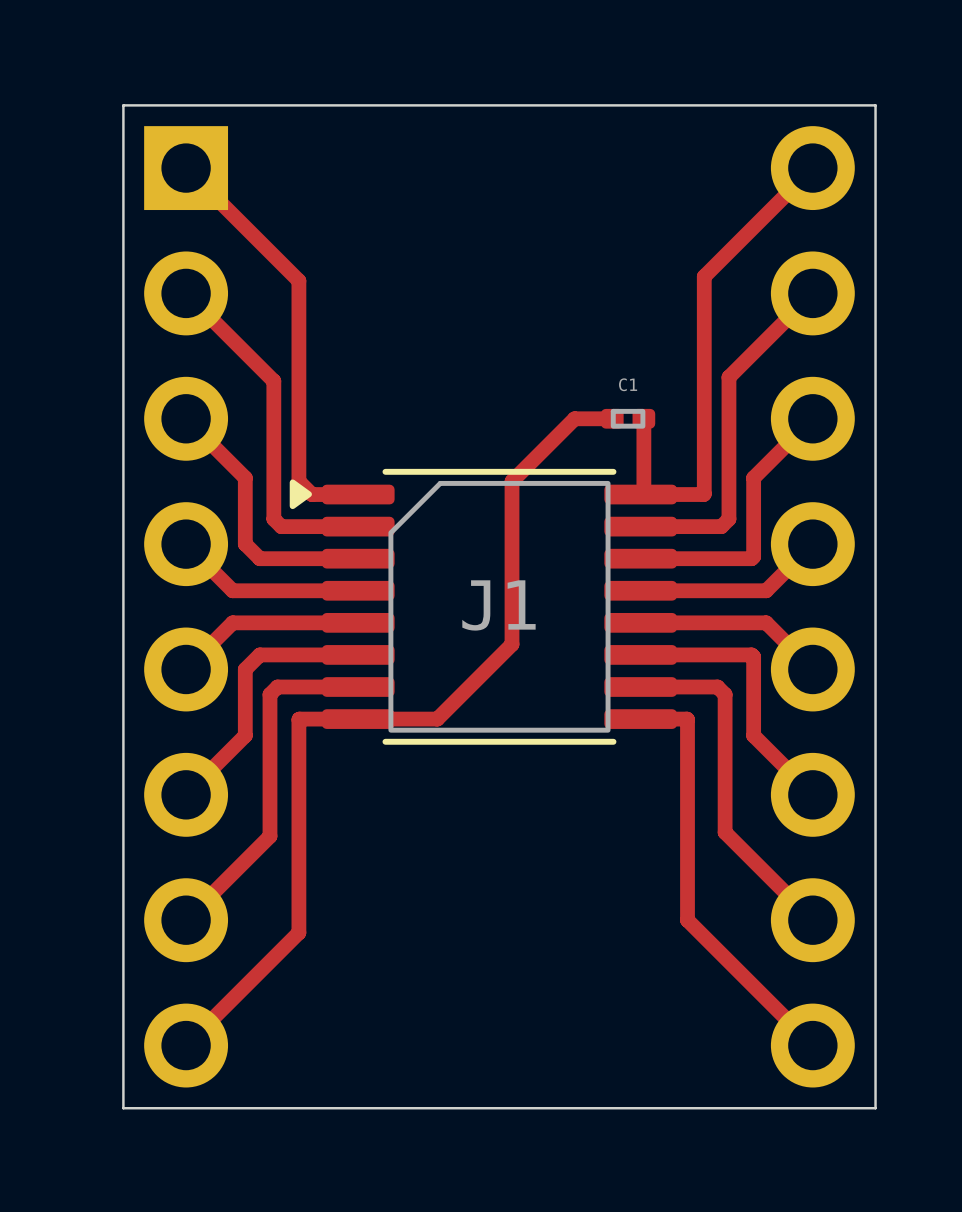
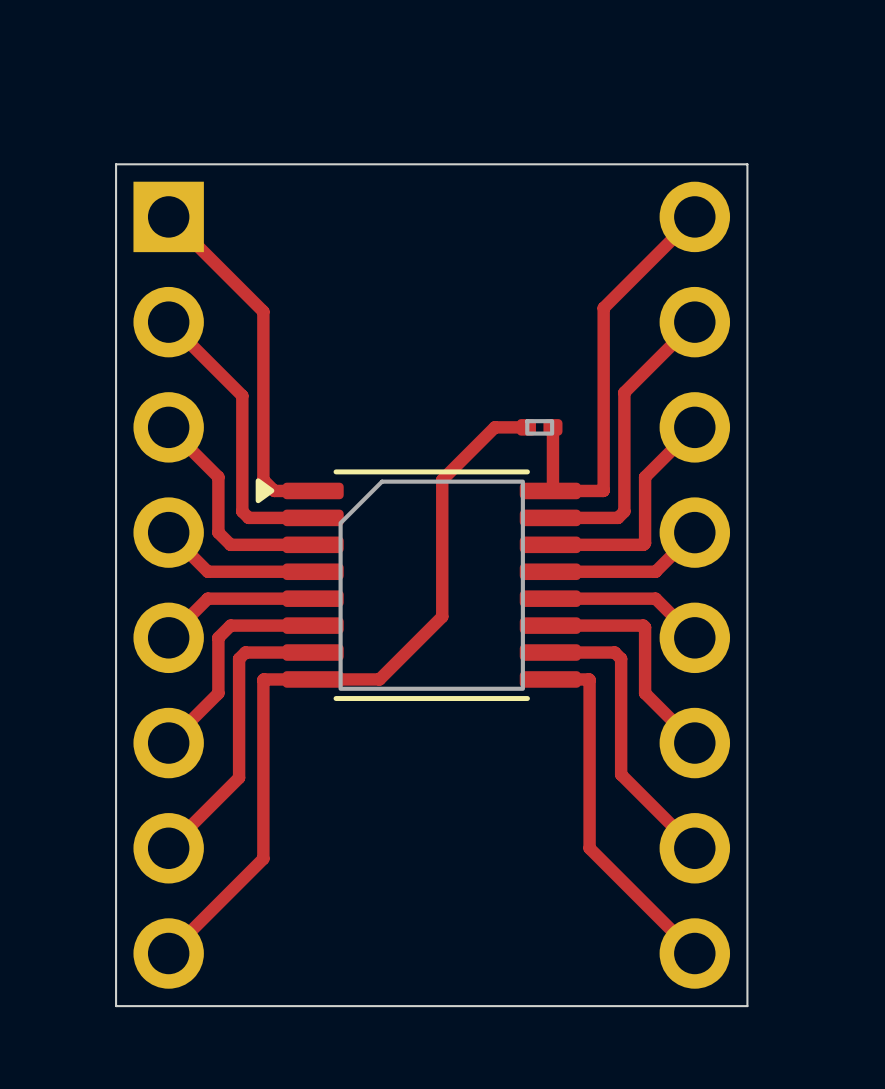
C1 name: C1 (628, 384) -> none
J1 name: J1 (498, 605) -> none

